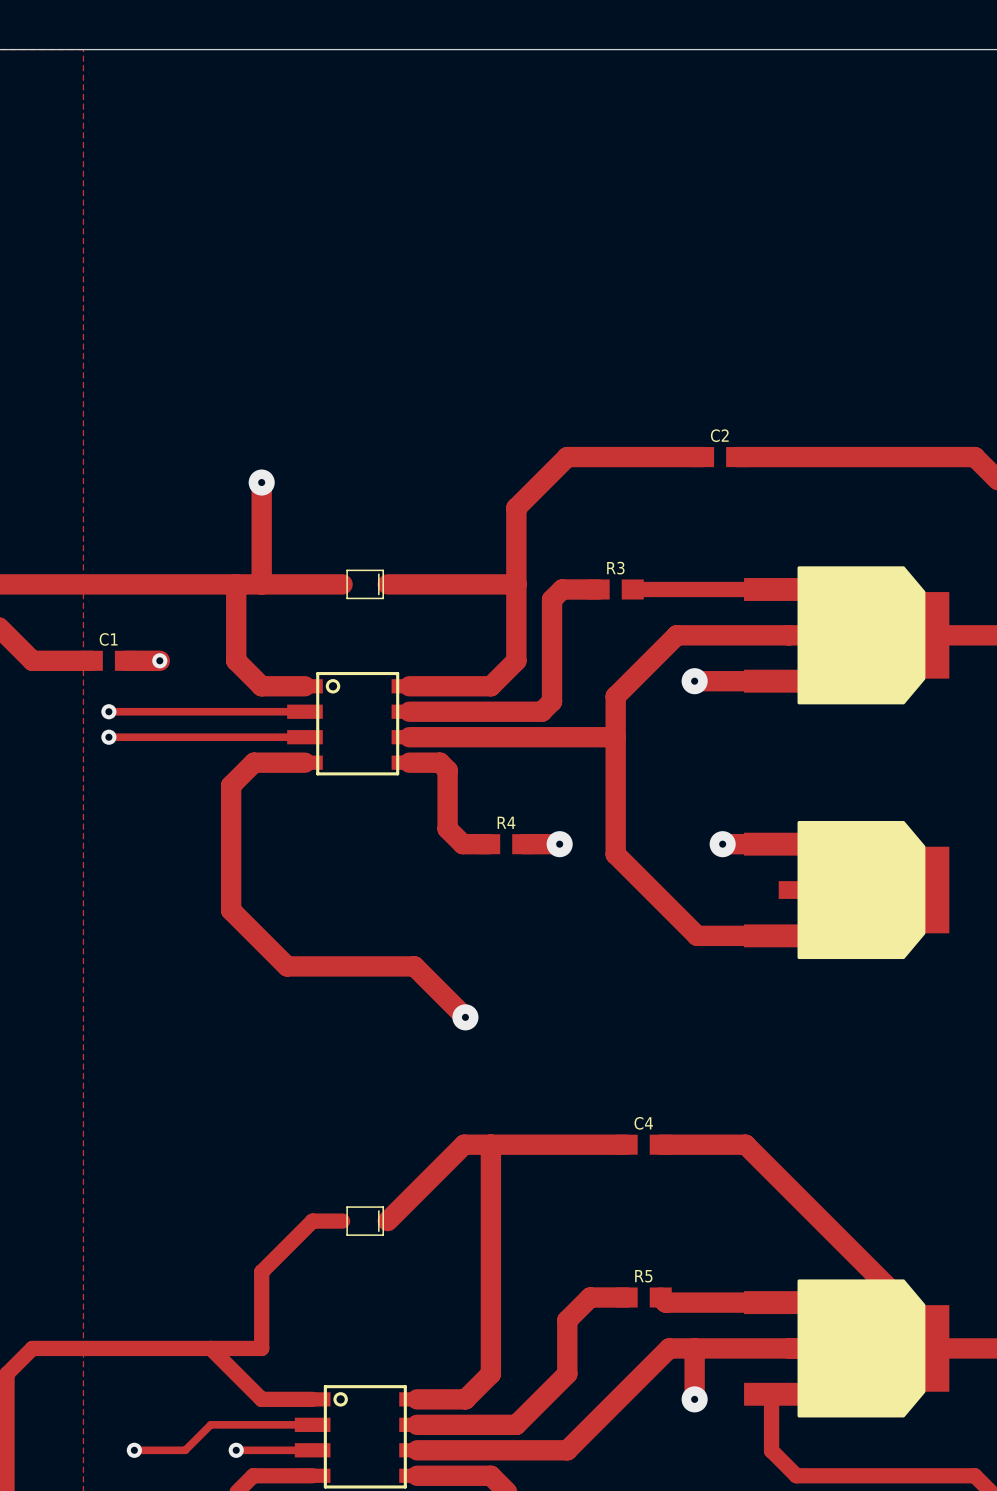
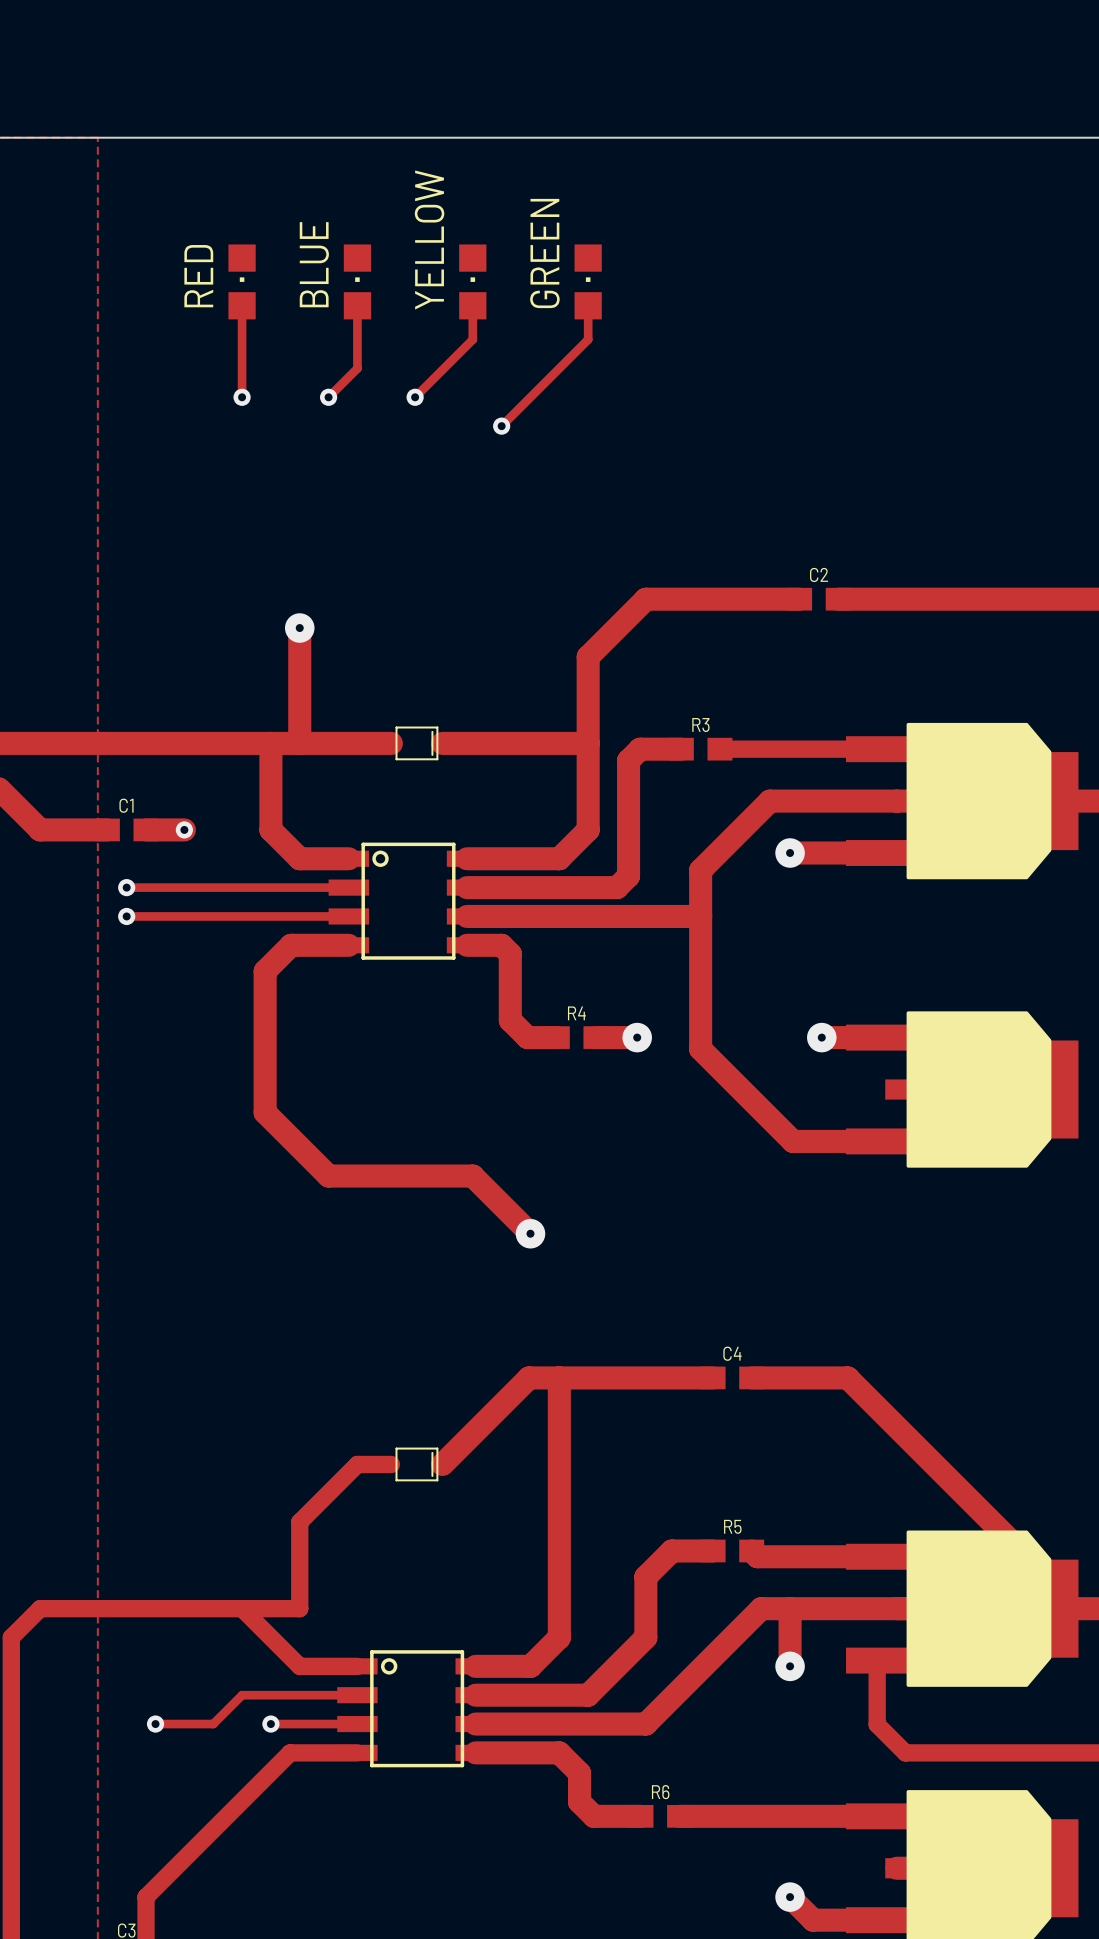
RED: none -> (242, 281)
BLUE: none -> (357, 281)
YELLOW: none -> (472, 281)
GREEN: none -> (588, 281)
track: none -> (242, 305) (242, 397)
track: none -> (357, 305) (357, 368) (328, 397)
track: none -> (472, 305) (472, 339) (415, 397)
track: none -> (588, 305) (588, 339) (501, 426)
via: none -> (242, 397)
via: none -> (328, 397)
via: none -> (415, 397)
via: none -> (501, 426)

